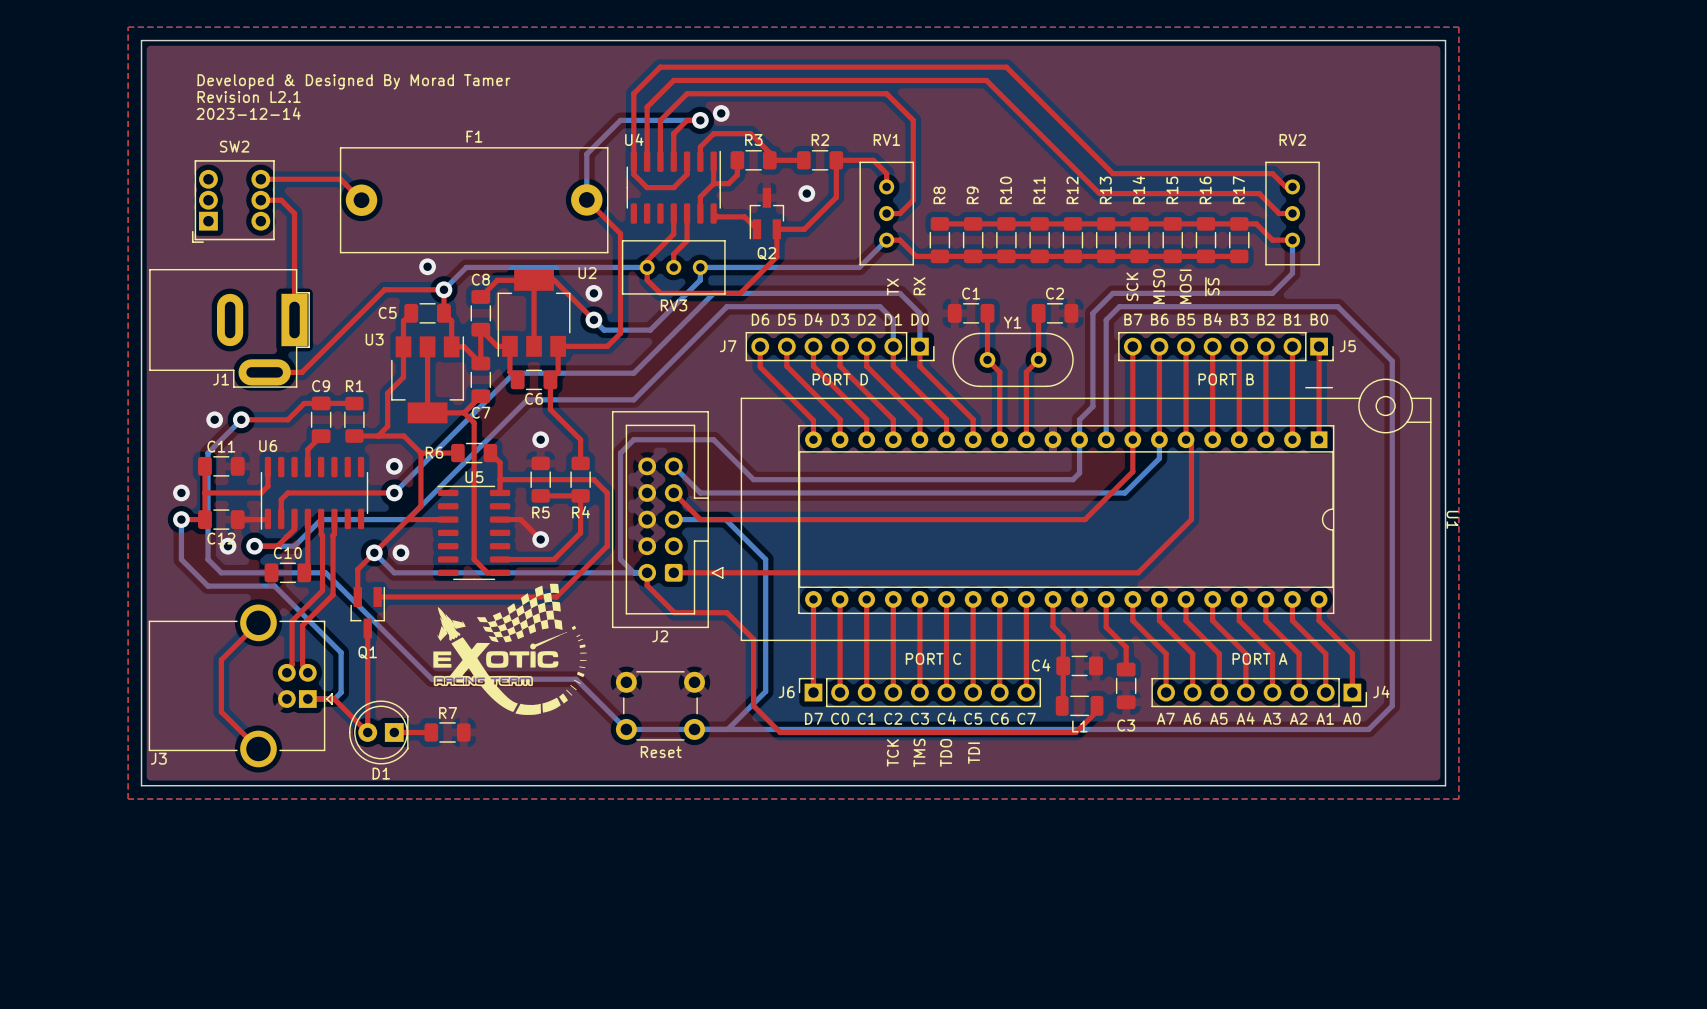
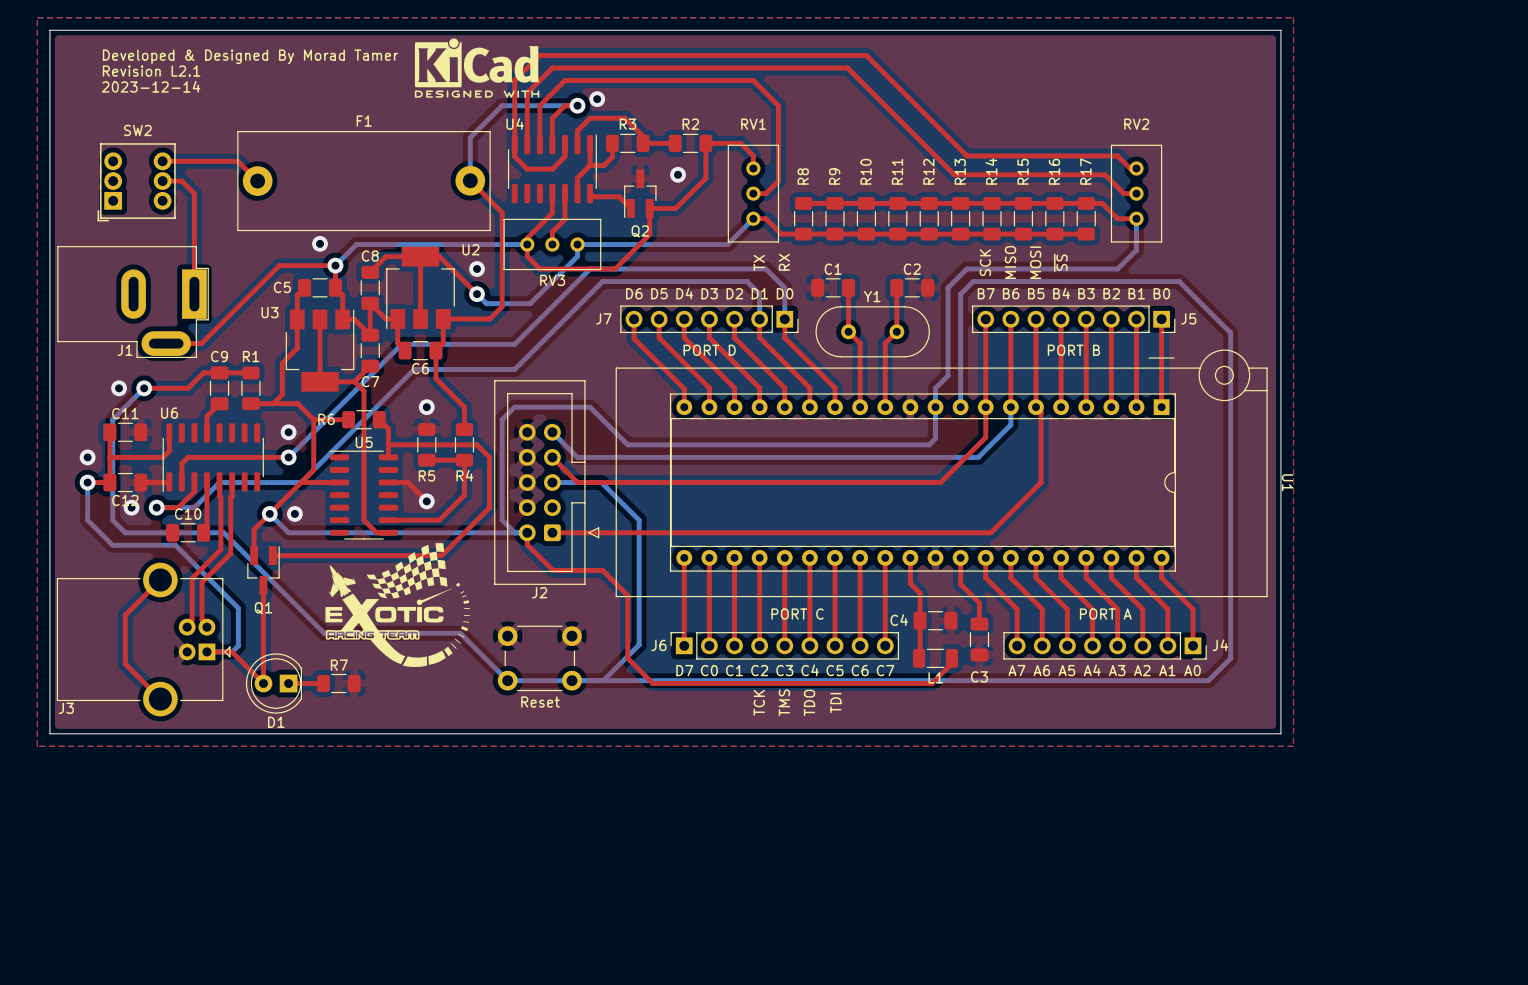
drawing: none -> [414, 38, 540, 98]
text: none -> Developed & Designed By Morad Tamer (250, 56)
text: Developed & Designed By Morad Tamer (353, 81) -> Revision L2.1 (151, 71)
text: Revision L2.1 (249, 97) -> 2023-12-14 (151, 86)
text: 2023-12-14 (248, 113) -> none

